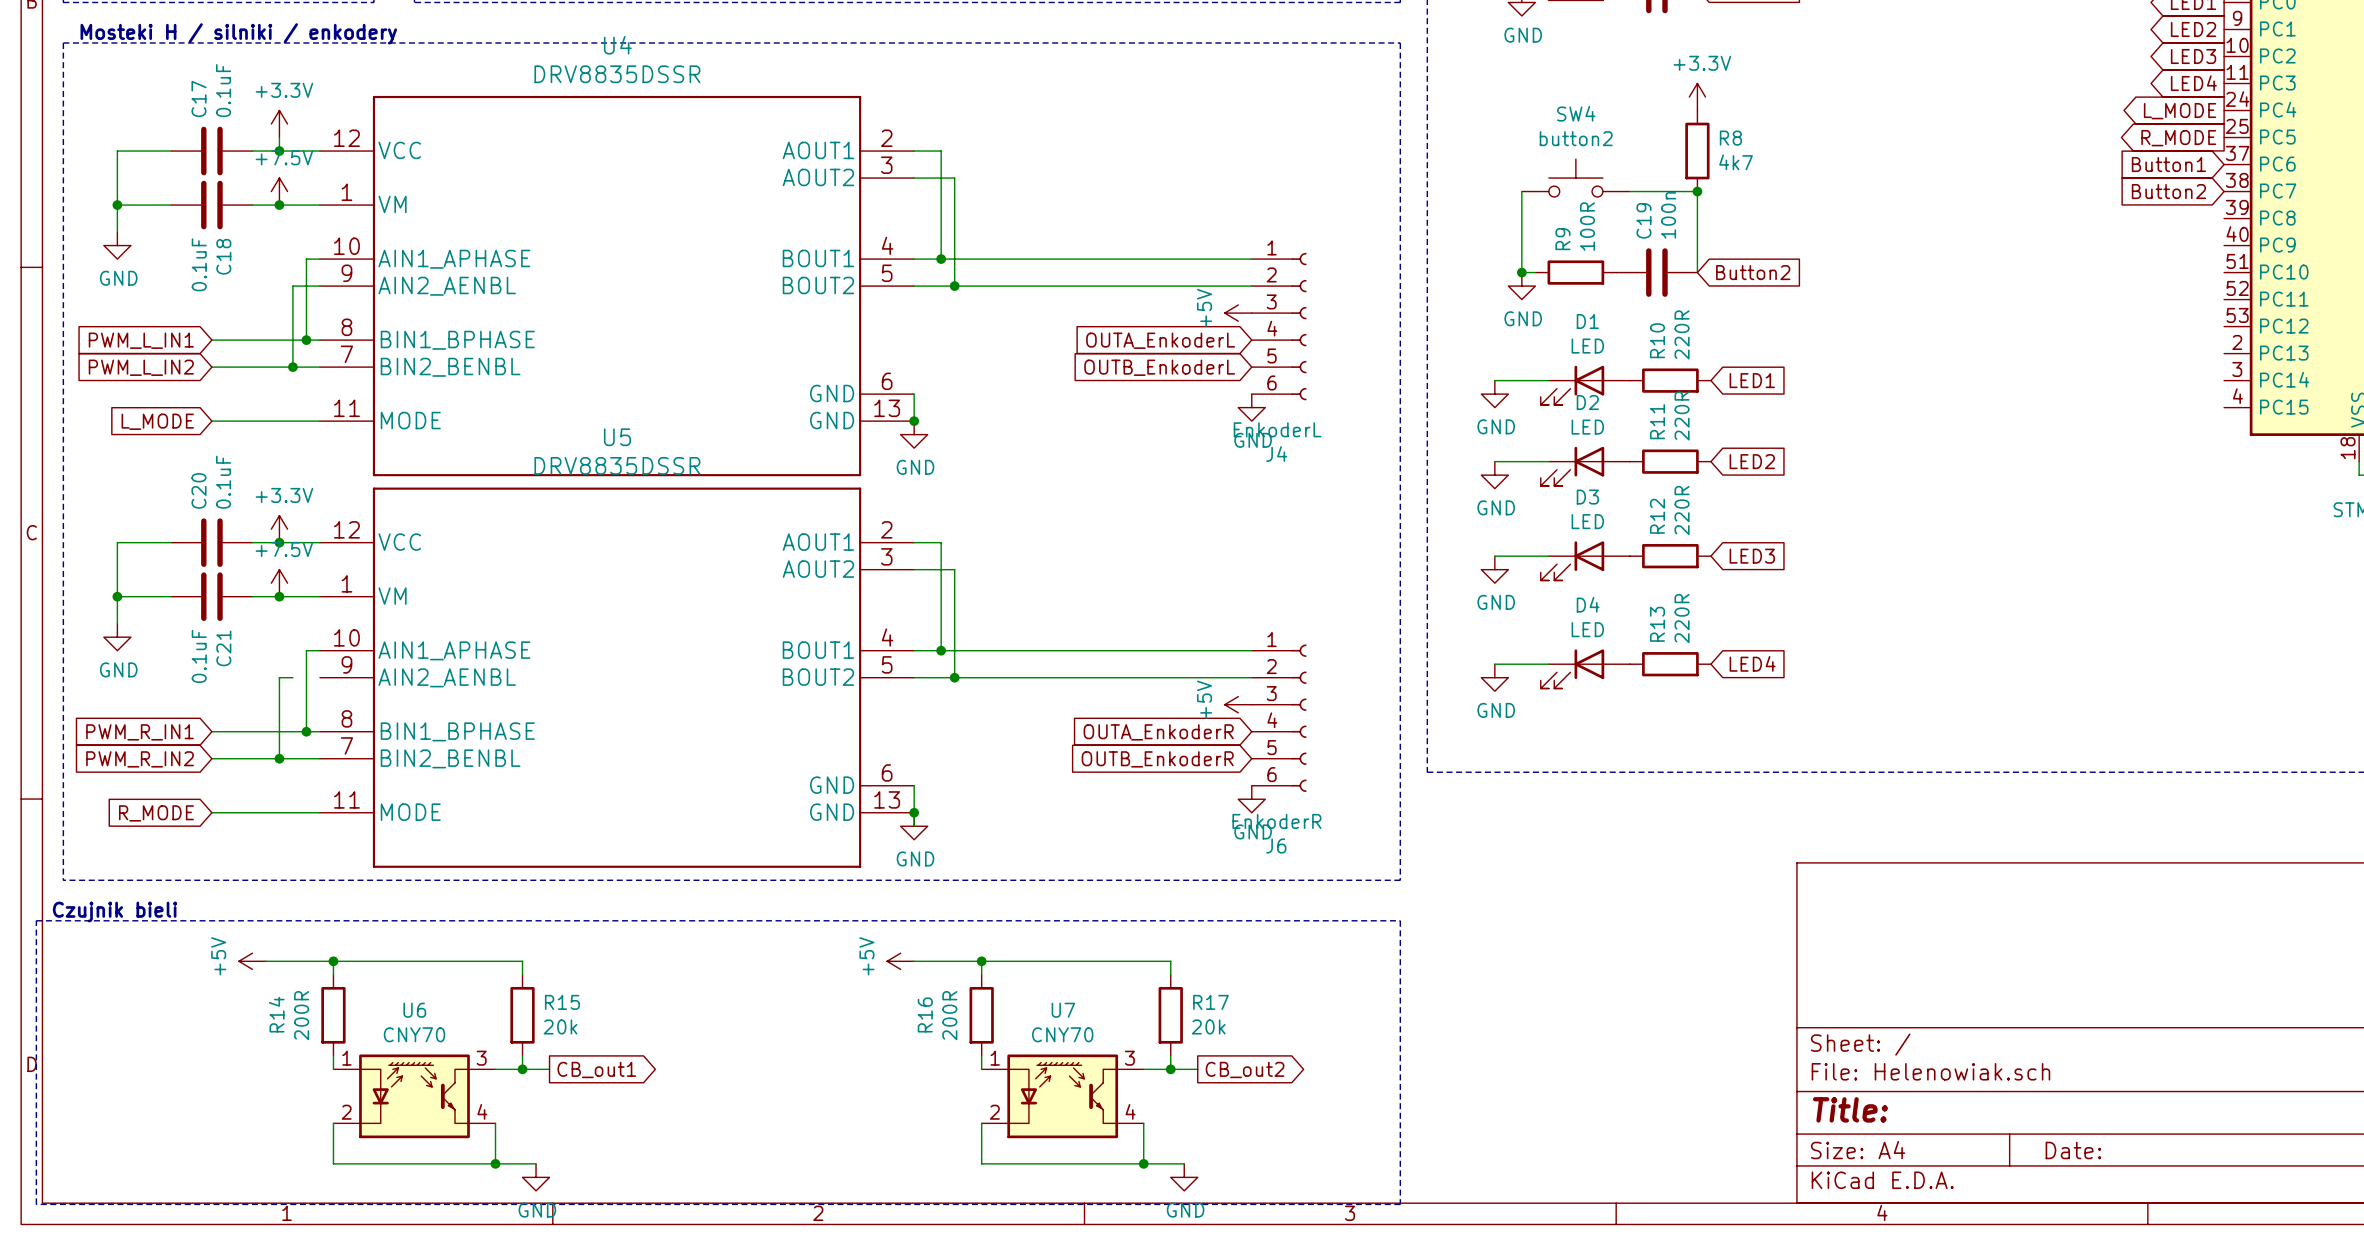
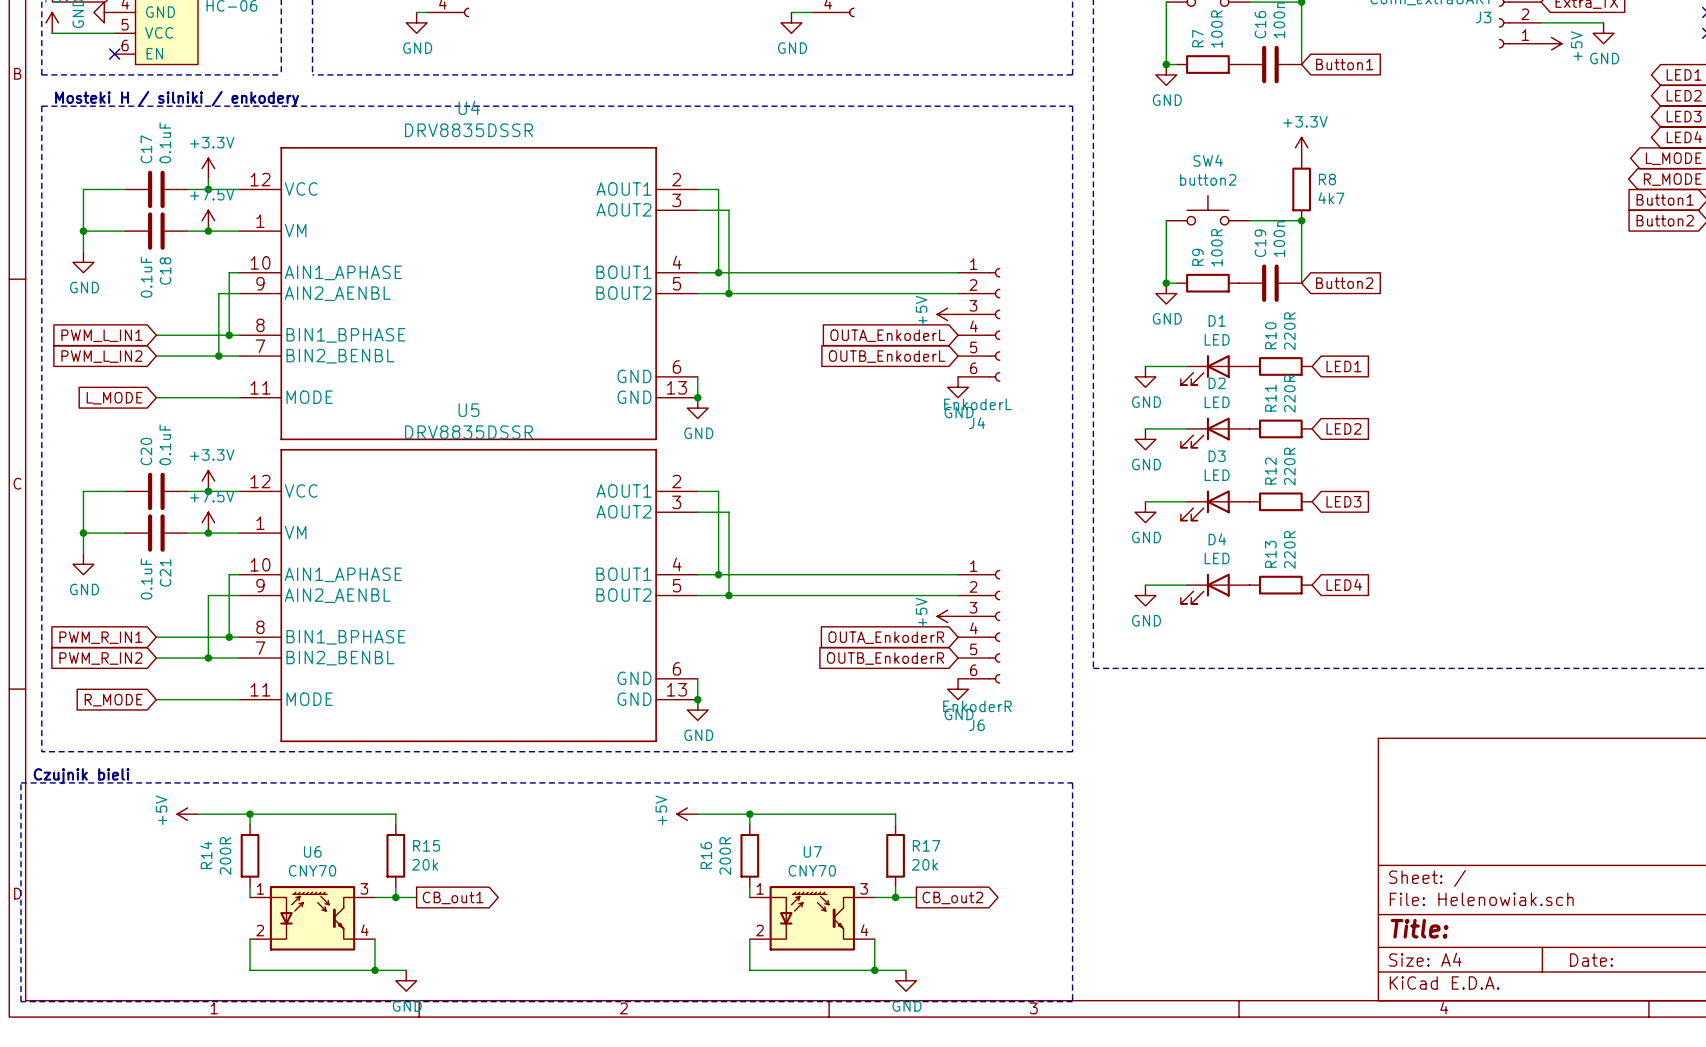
wire: none -> (218, 595) (239, 595)

